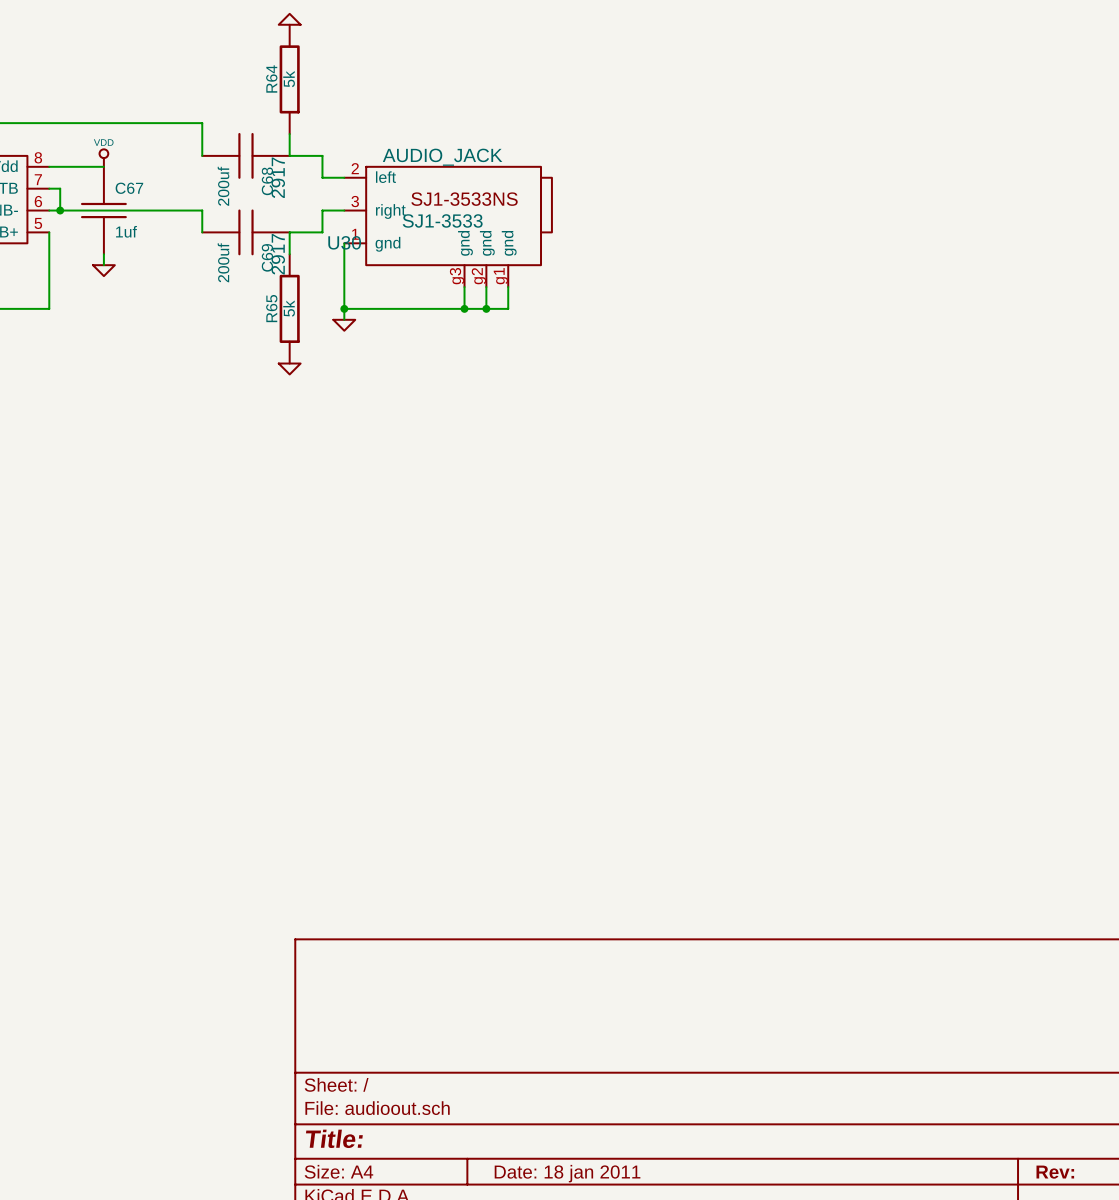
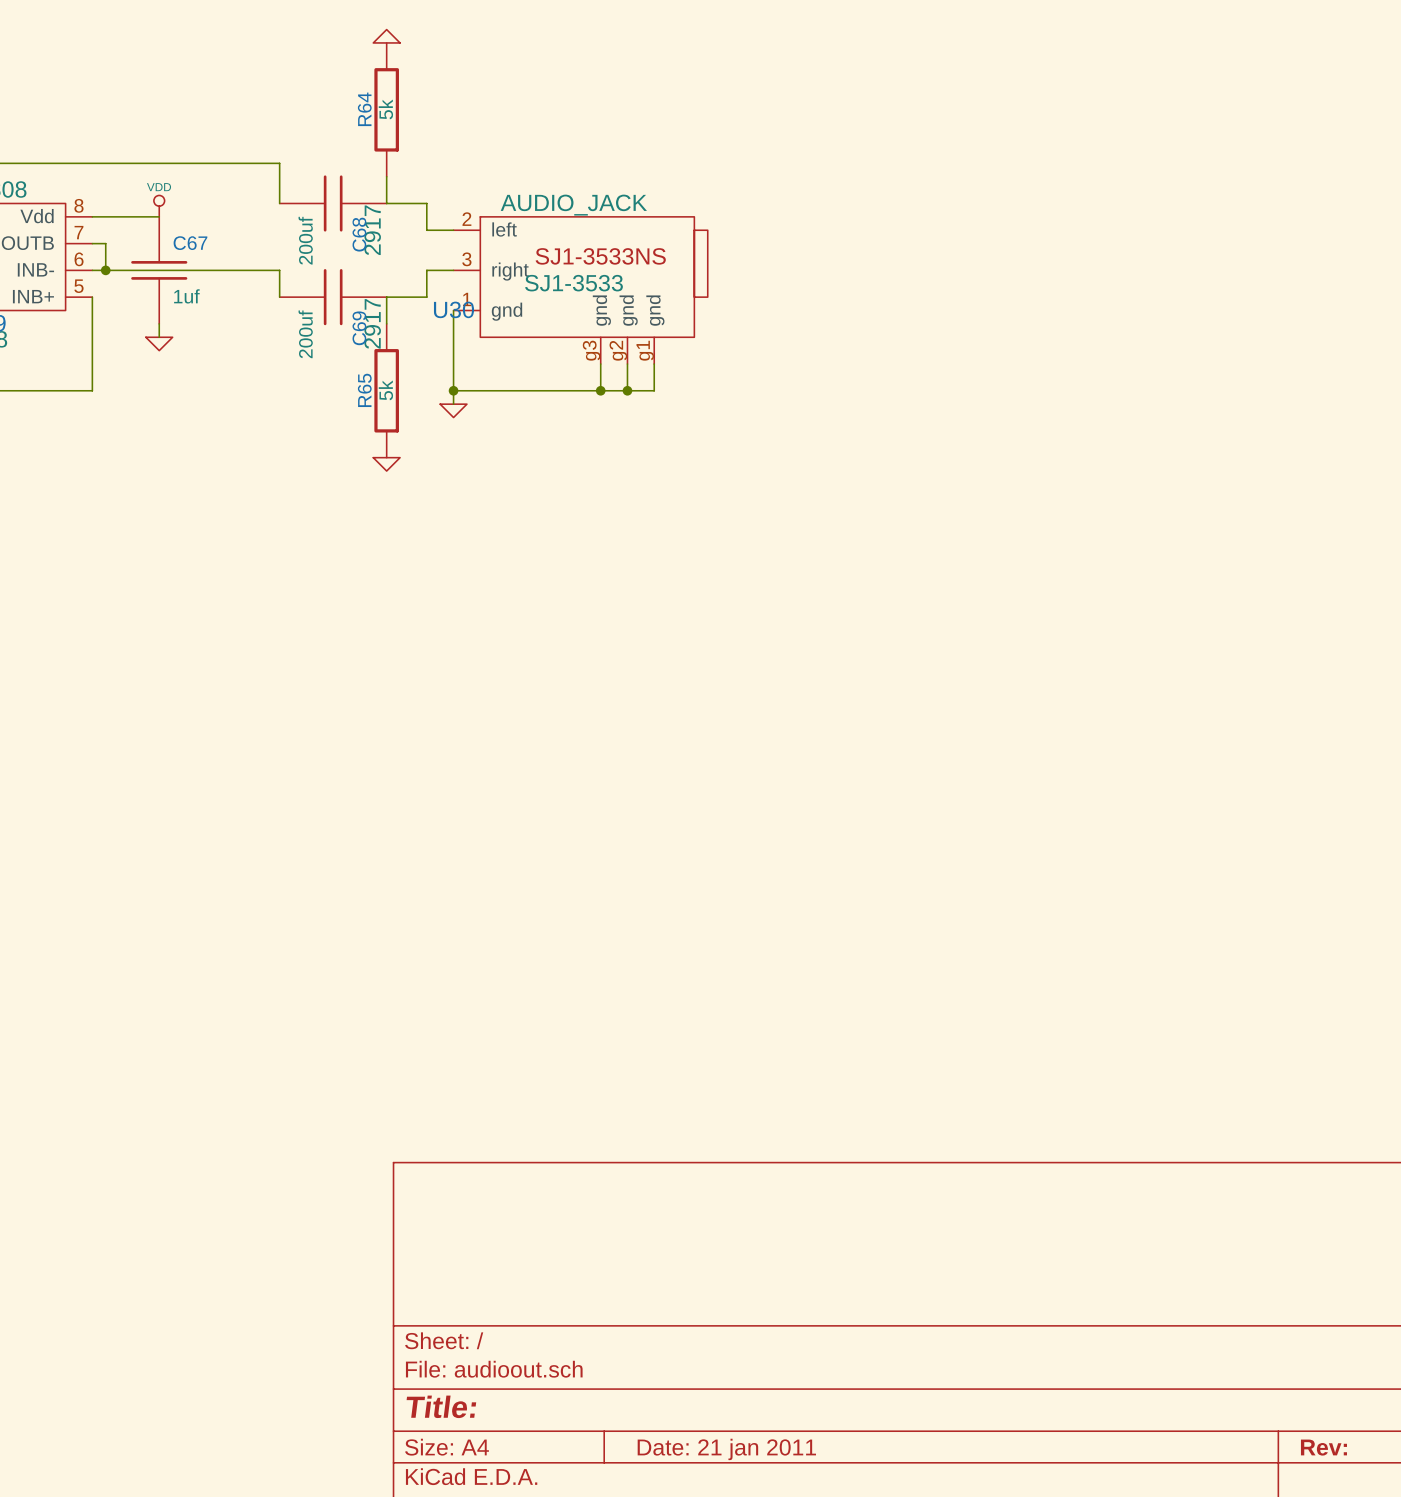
title block: Date: 18 jan 2011 (567, 1173) -> Date: 21 jan 2011 (726, 1449)

